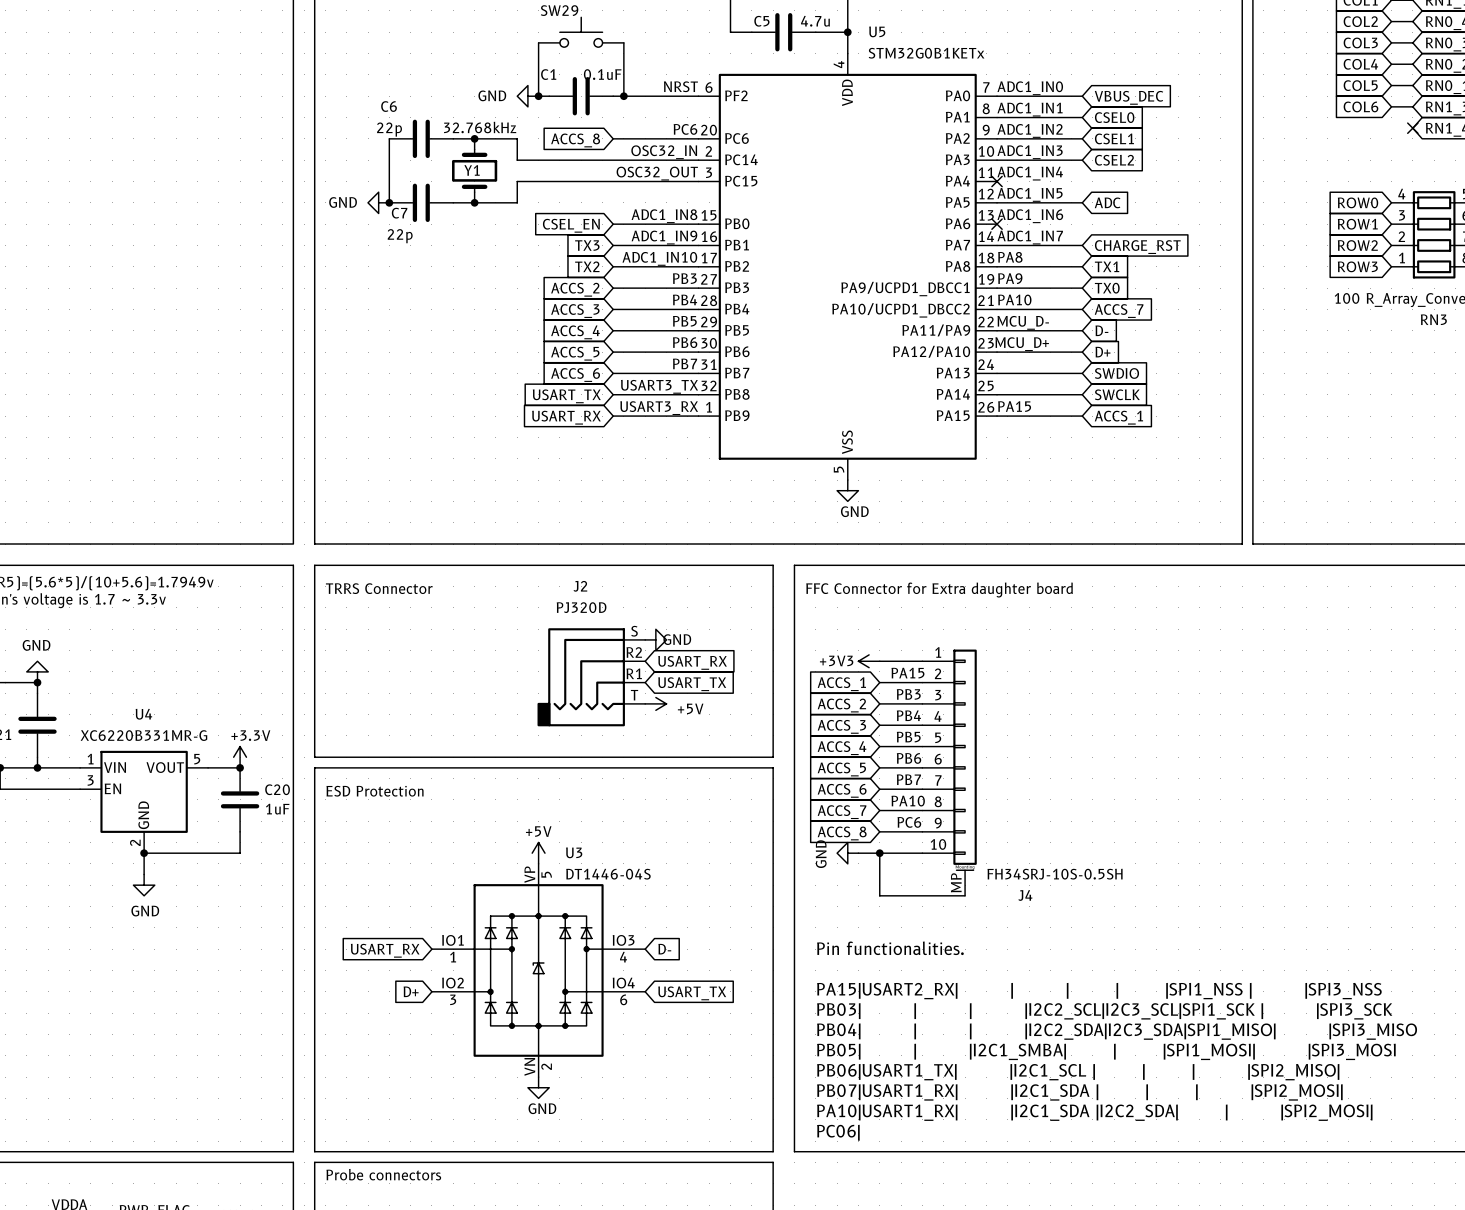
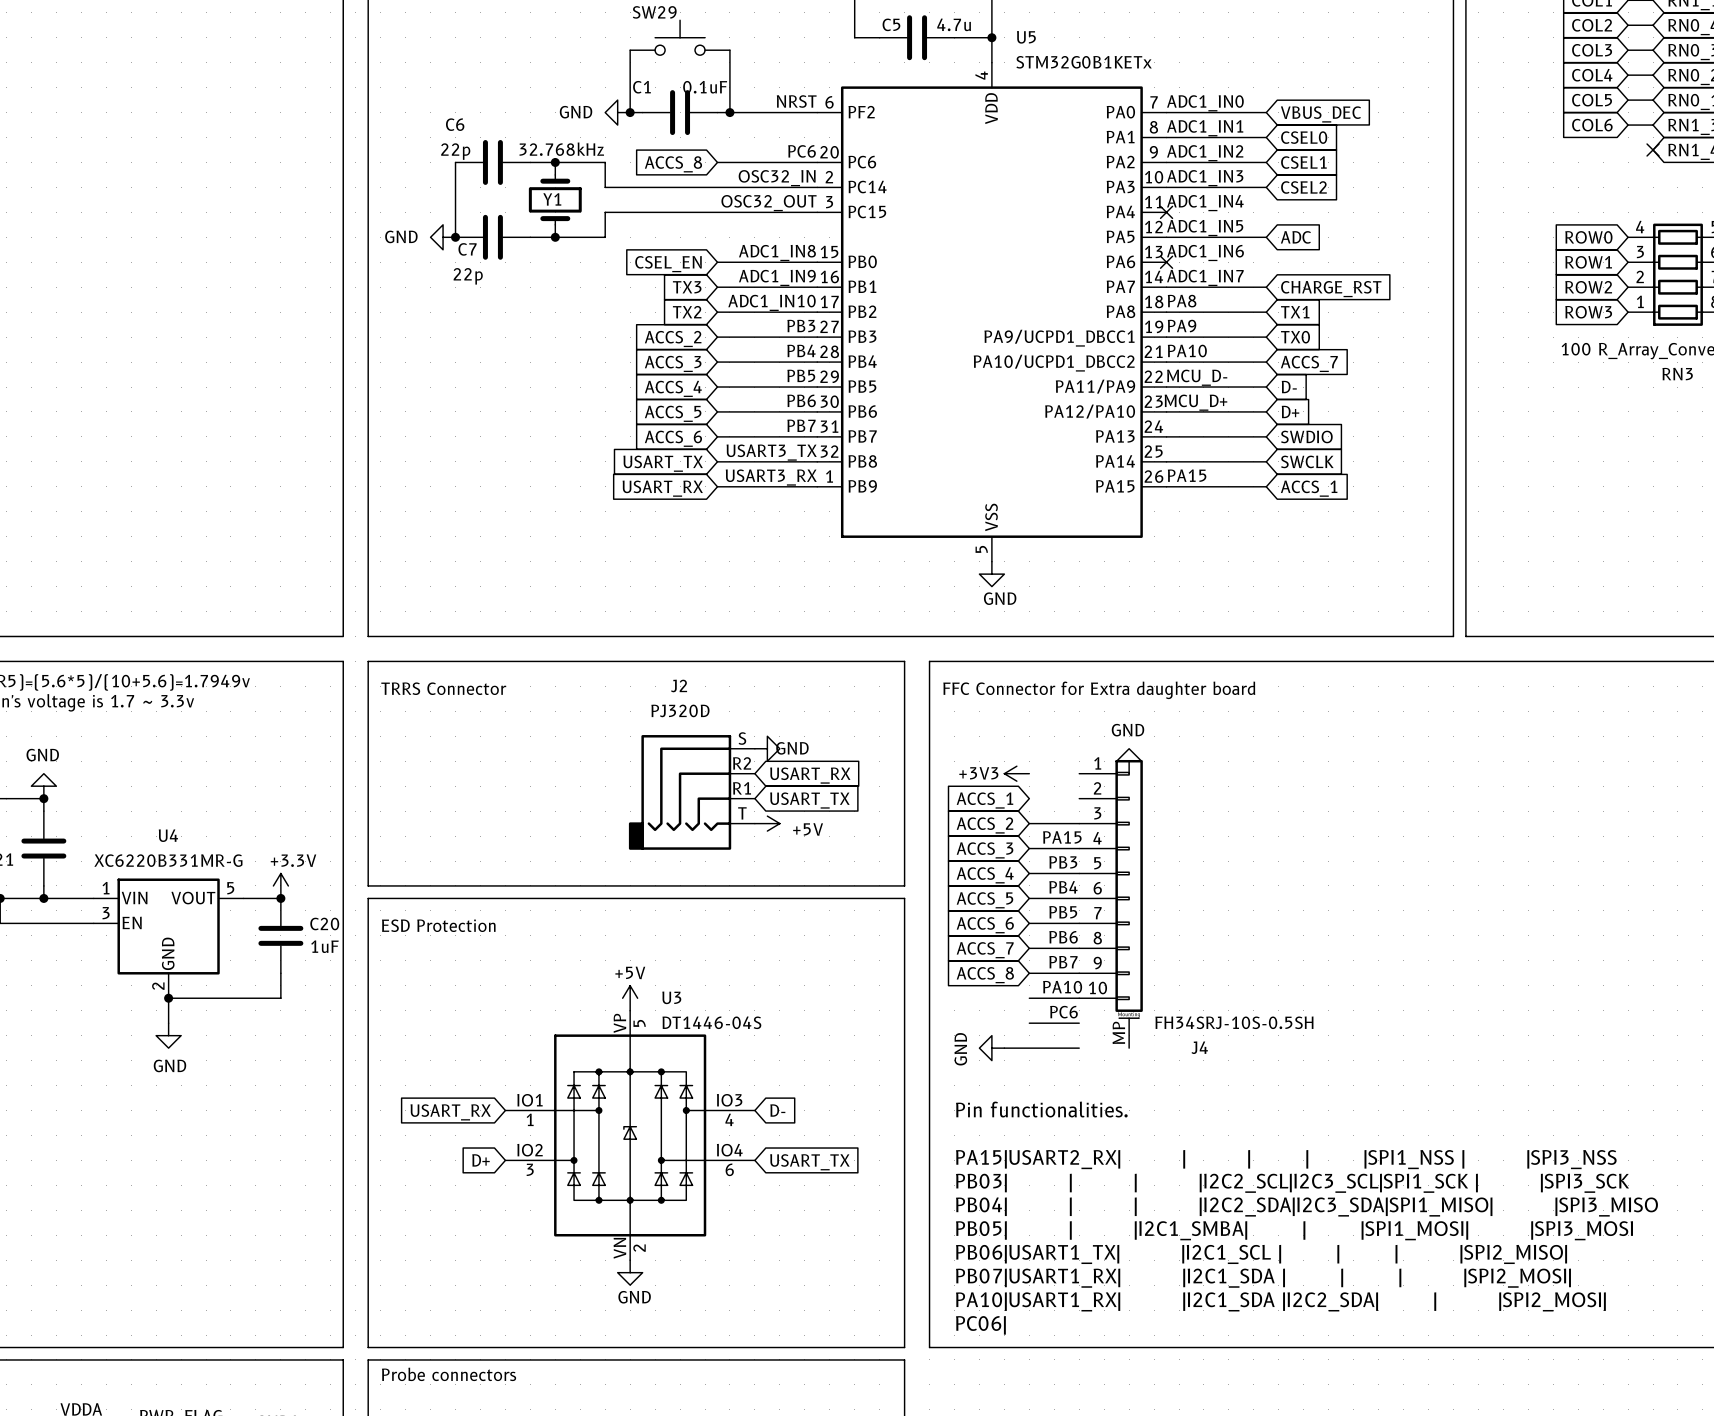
power symbol: none -> GND (1129, 761)
wire: (879, 661) (922, 661) -> none
label position: PA15 (907, 673) -> PA15 (1062, 837)
wire: (879, 682) (922, 682) -> none
label: PB3 (908, 694) -> none
label: PB4 (908, 715) -> none
label: PB5 (908, 737) -> PB3 (1063, 862)
label: PB6 (909, 758) -> PB4 (1063, 887)
label: PB7 (908, 779) -> PB5 (1063, 912)
label position: PA10 (908, 801) -> PA10 (1062, 987)
label: none -> PB6 (1063, 937)
label: PC6 (909, 822) -> PB7 (1063, 962)
power symbol position: GND (847, 853) -> GND (991, 1048)
wire: (858, 853) (879, 853) (879, 895) -> (1004, 1048) (1029, 1048)
junction: (879, 853) -> none
label: none -> PC6 (1063, 1012)
wire: (922, 895) (965, 895) -> (1029, 1023) (1079, 1023)

